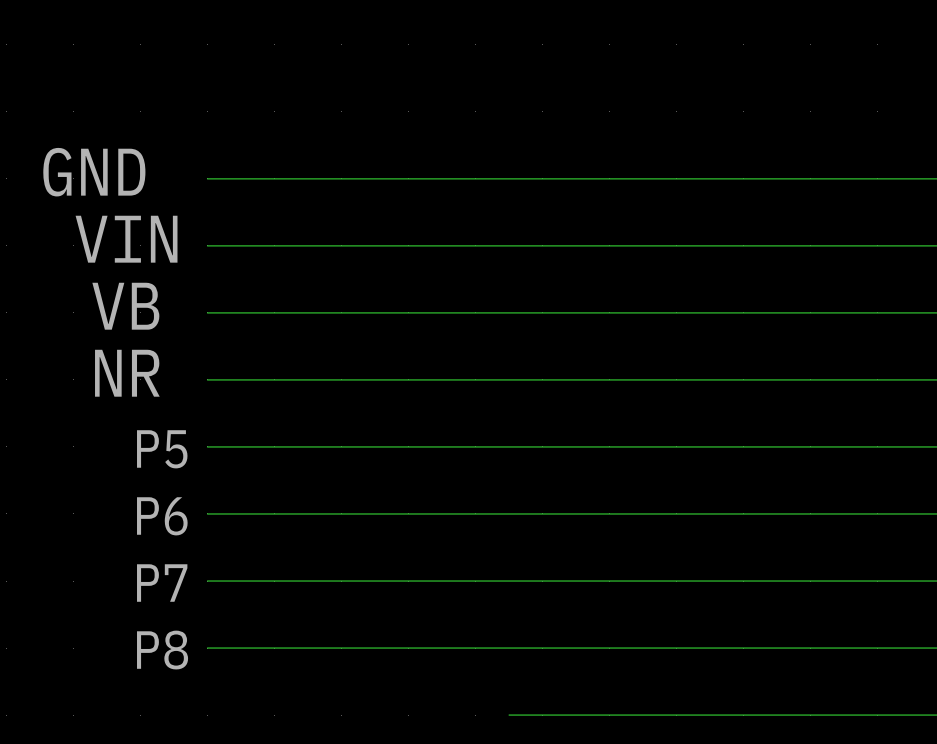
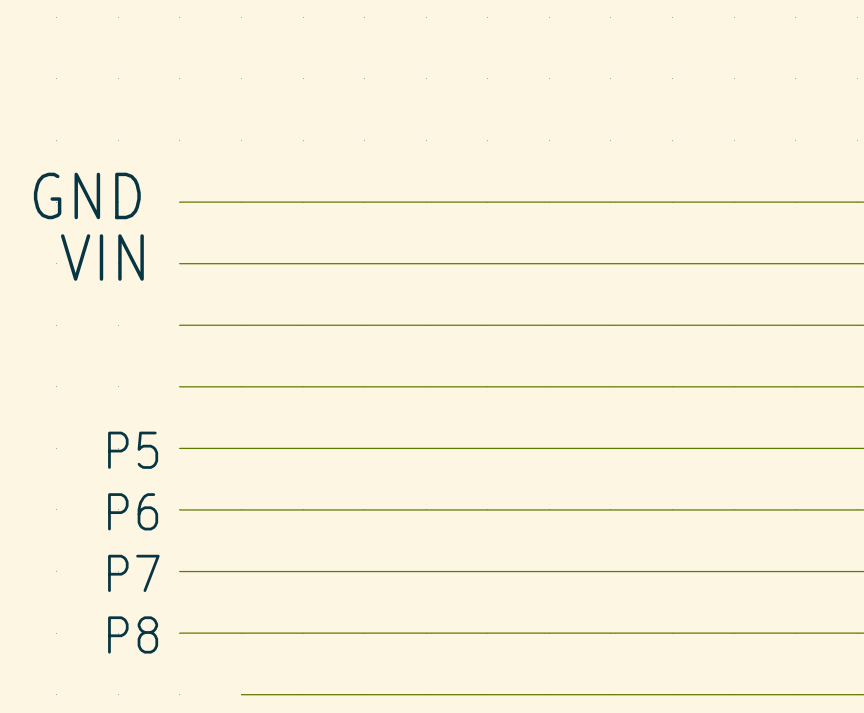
label: VB (125, 306) -> none
label: NR (127, 373) -> none
wire: none -> (241, 694) (456, 694)

